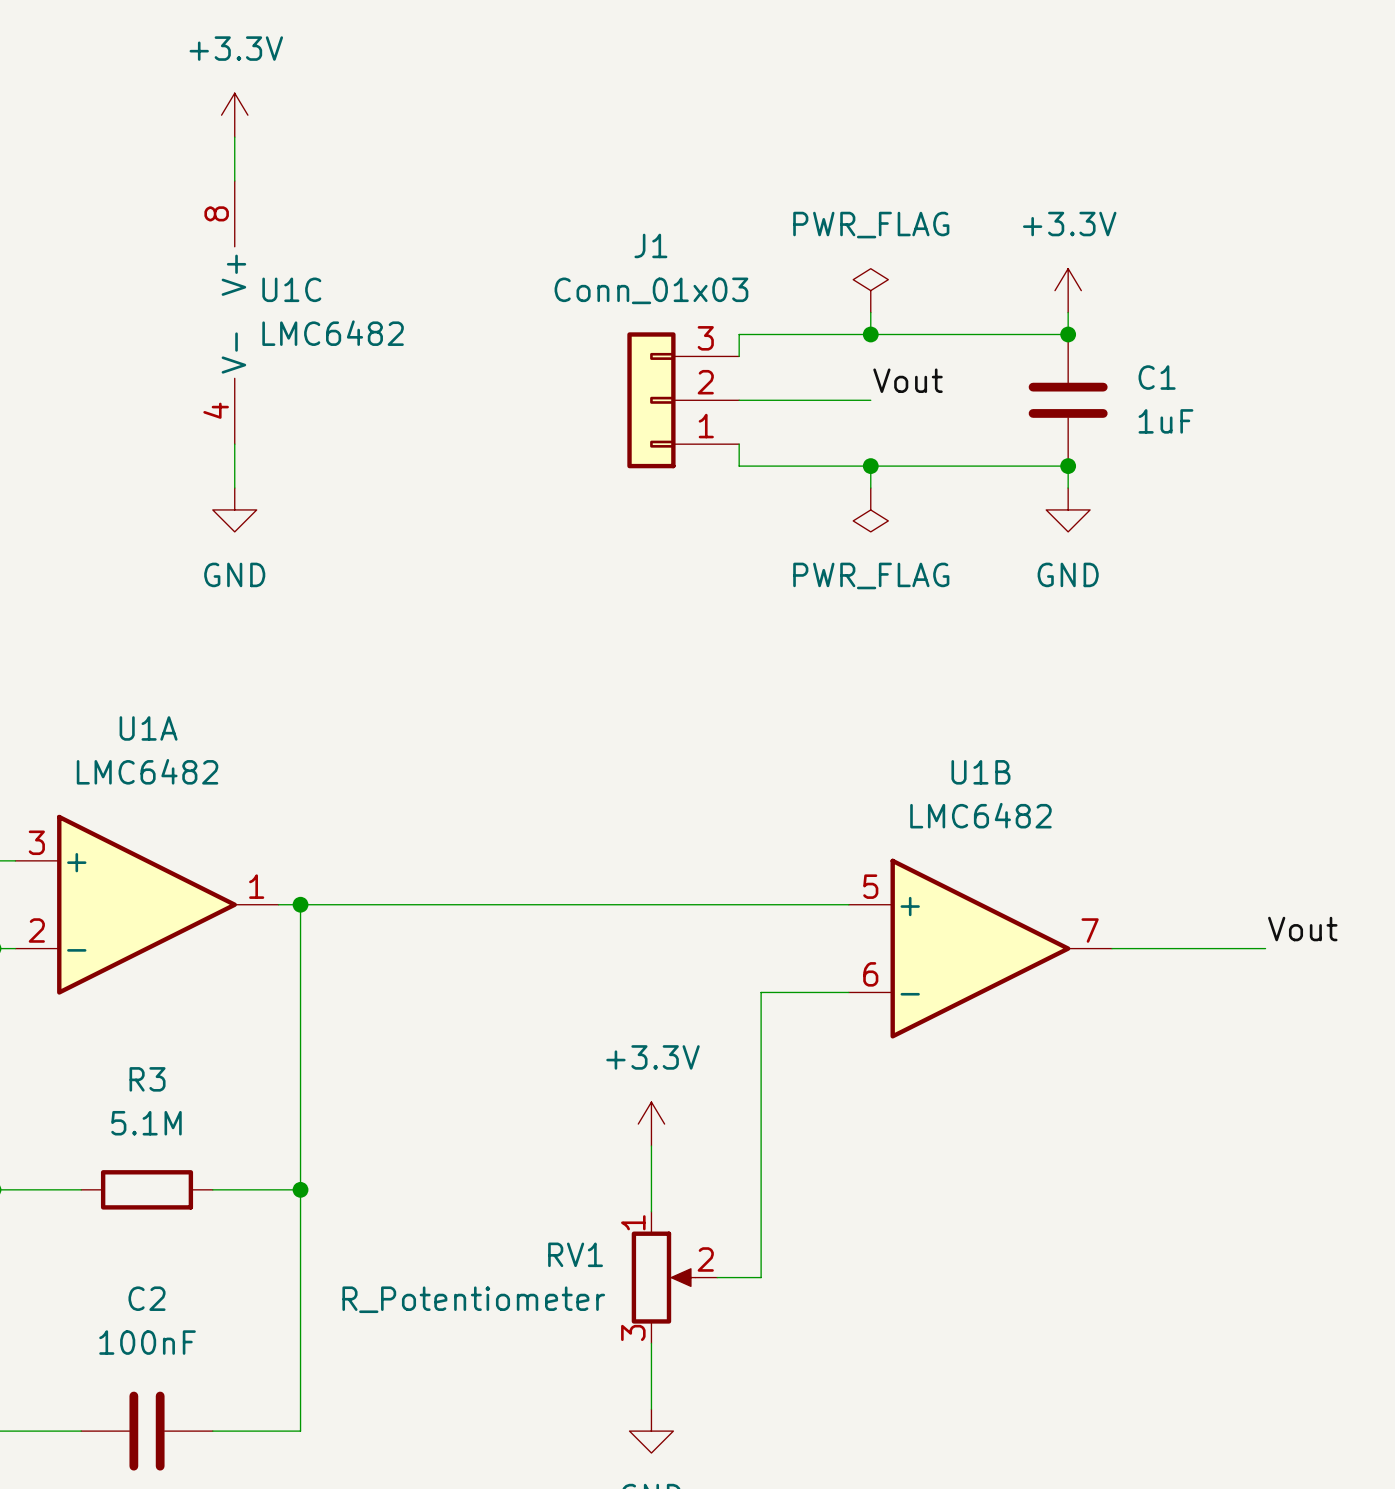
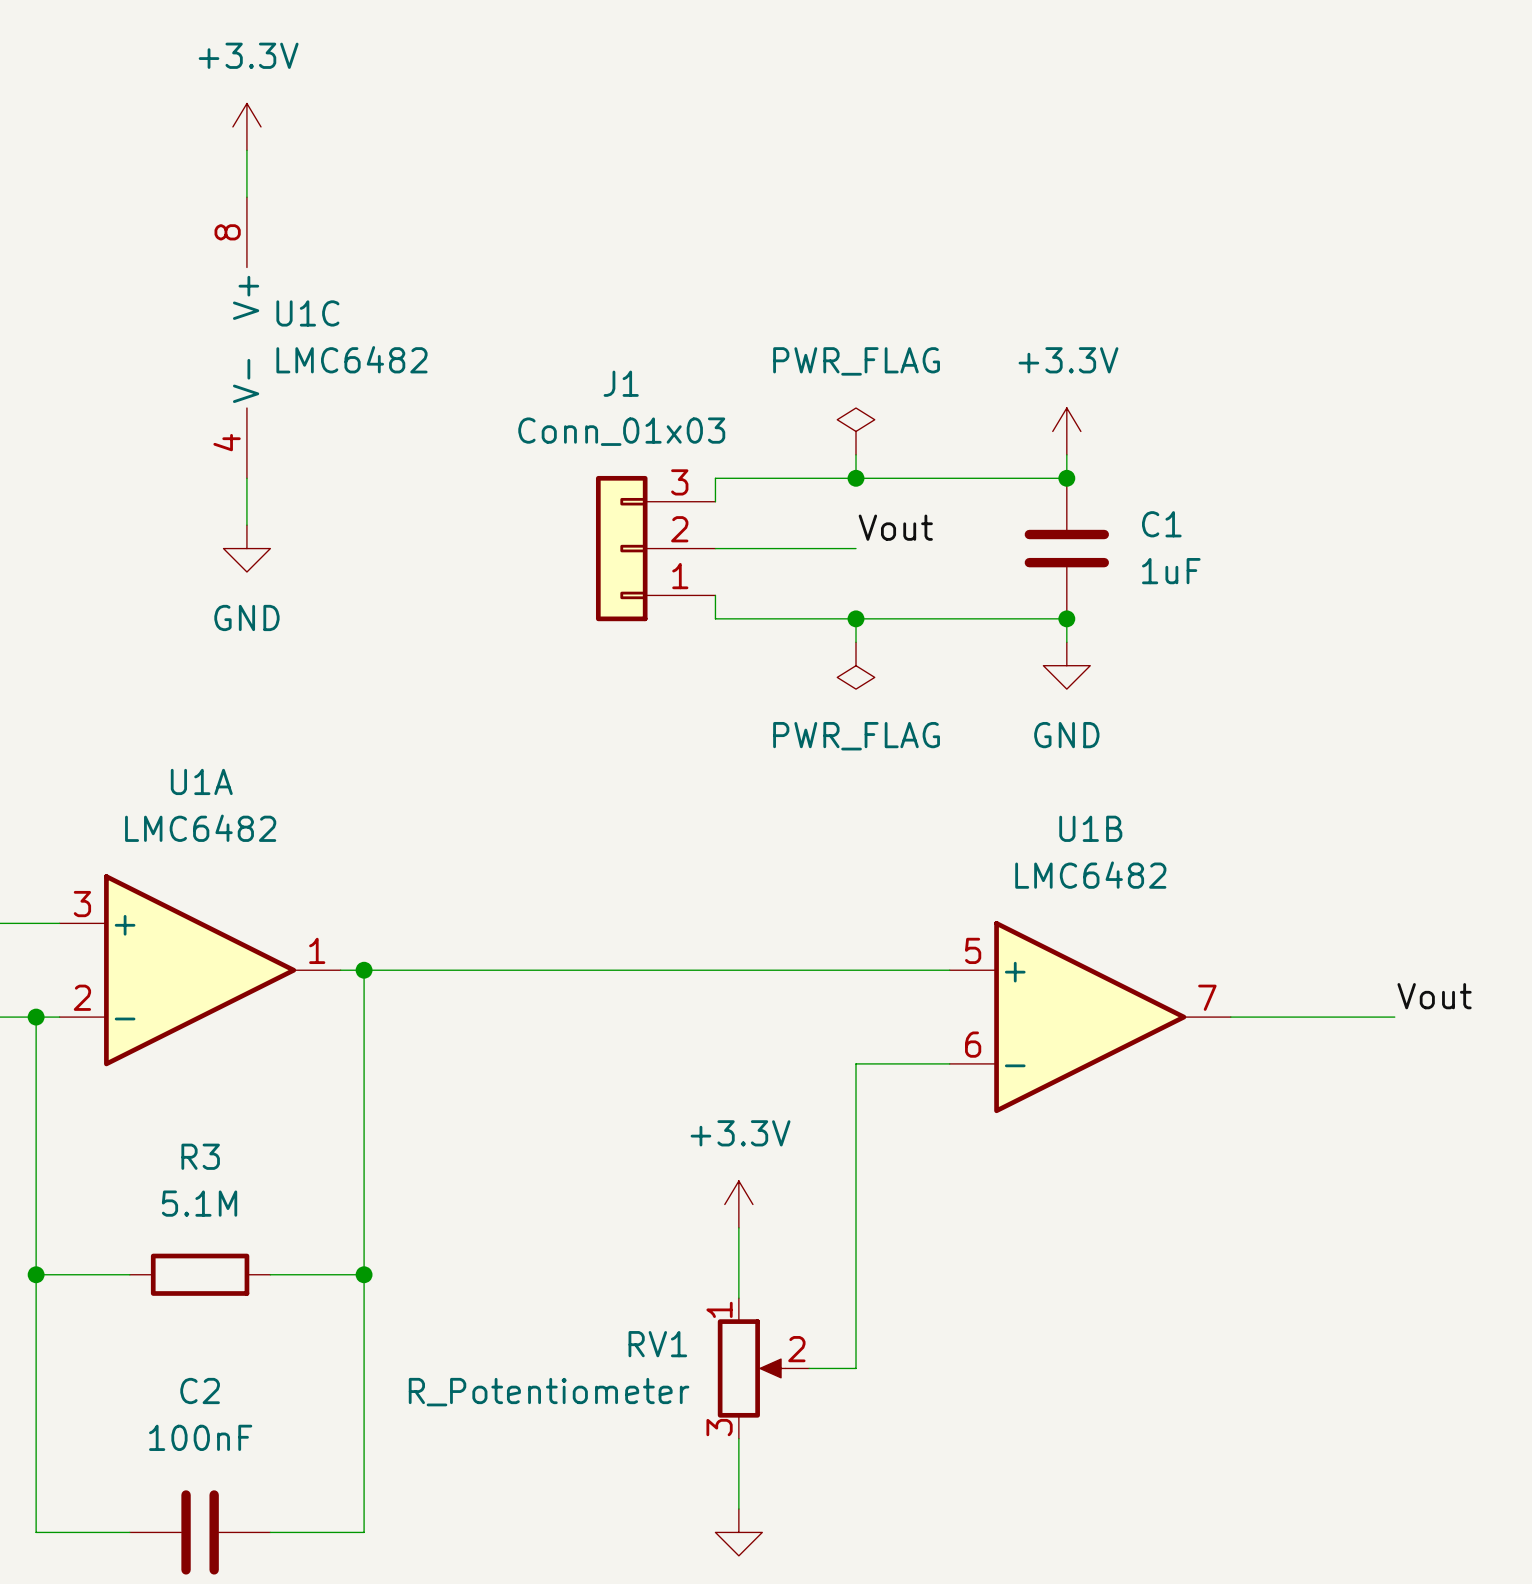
power symbol position: +3.3V (234, 115) -> +3.3V (246, 126)
wire: (234, 137) (234, 180) -> (246, 150) (246, 197)
power symbol: PWR_FLAG (870, 290) -> none
power symbol position: +3.3V (1068, 290) -> +3.3V (1066, 431)
U1C position: (234, 312) -> (246, 337)
wire: (870, 312) (870, 334) -> (856, 454) (856, 478)
wire: (1068, 312) (1068, 334) (739, 334) (739, 356) -> (1066, 454) (1066, 478) (715, 478) (715, 501)
junction: (870, 334) -> none
junction: (1068, 334) -> none
label position: Vout (908, 380) -> Vout (895, 527)
J1 position: (683, 400) -> (655, 548)
wire: (739, 400) (870, 400) -> (715, 548) (856, 548)
power symbol: none -> PWR_FLAG (856, 431)
C1 position: (1068, 400) -> (1066, 548)
wire: (234, 444) (234, 488) -> (246, 478) (246, 525)
wire: (739, 444) (739, 466) (1068, 466) (1068, 488) -> (715, 595) (715, 618) (1066, 618) (1066, 642)
junction: none -> (856, 478)
junction: none -> (1066, 478)
wire: (870, 466) (870, 488) -> (856, 618) (856, 642)
junction: (870, 466) -> none
junction: (1068, 466) -> none
power symbol position: GND (234, 509) -> GND (246, 548)
power symbol: PWR_FLAG (870, 509) -> none
power symbol position: GND (1068, 509) -> GND (1066, 665)
junction: none -> (856, 618)
junction: none -> (1066, 618)
power symbol: none -> PWR_FLAG (856, 665)

